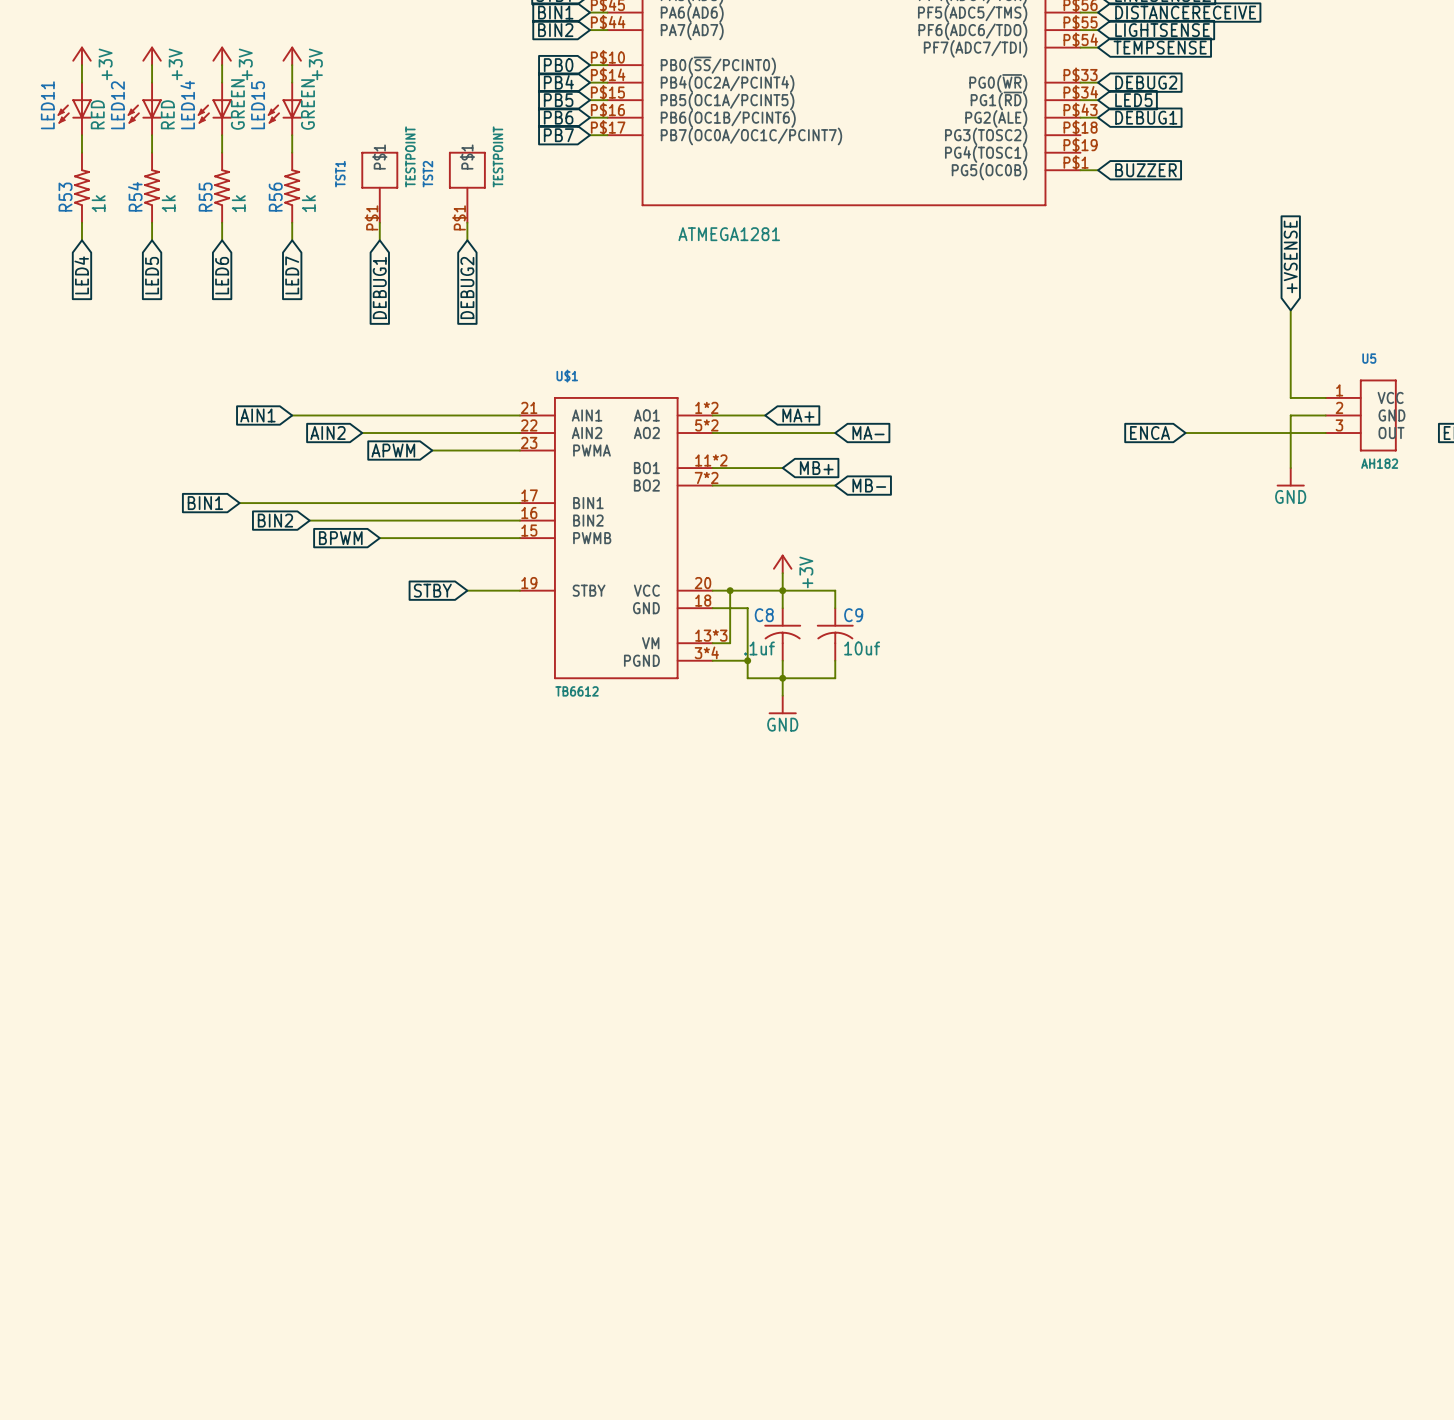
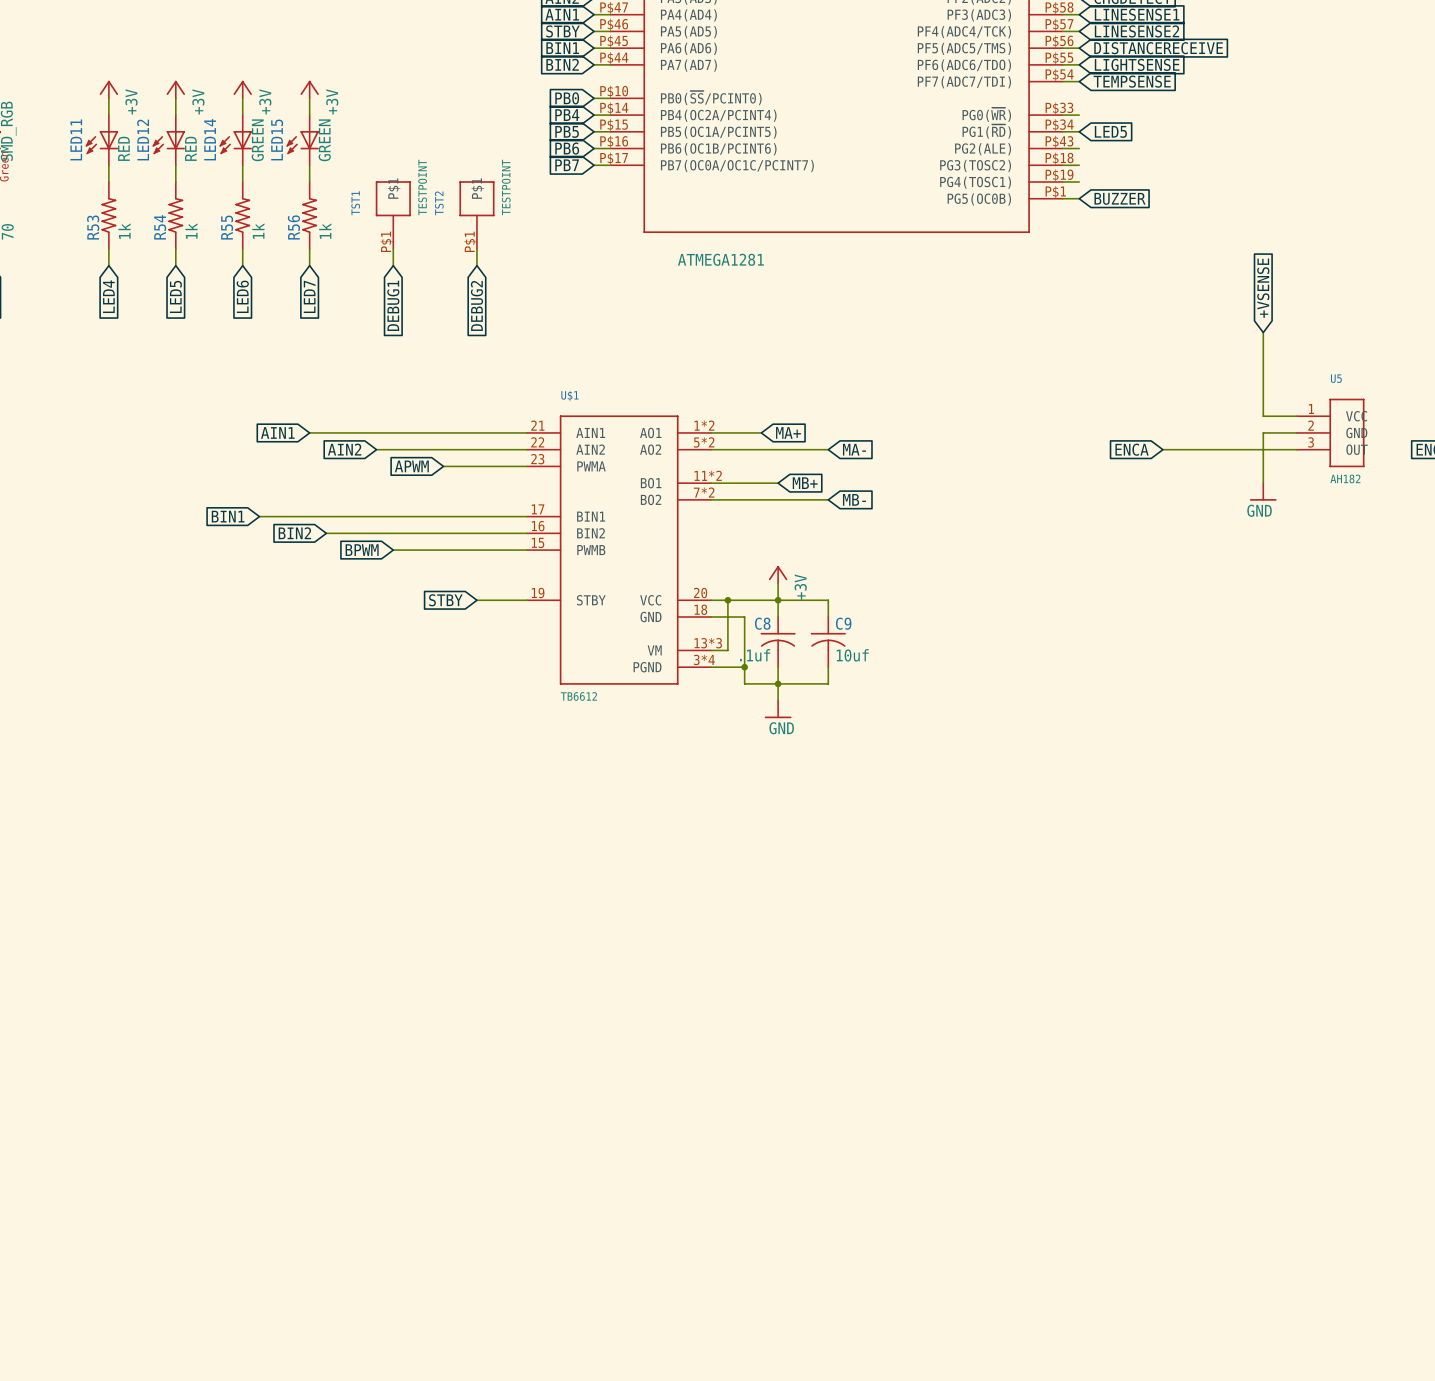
global label: DEBUG2 (1146, 82) -> none
global label: DEBUG1 (1146, 117) -> none
wire: none -> (1062, 165) (1079, 165)
wire: none -> (1062, 182) (1079, 182)

